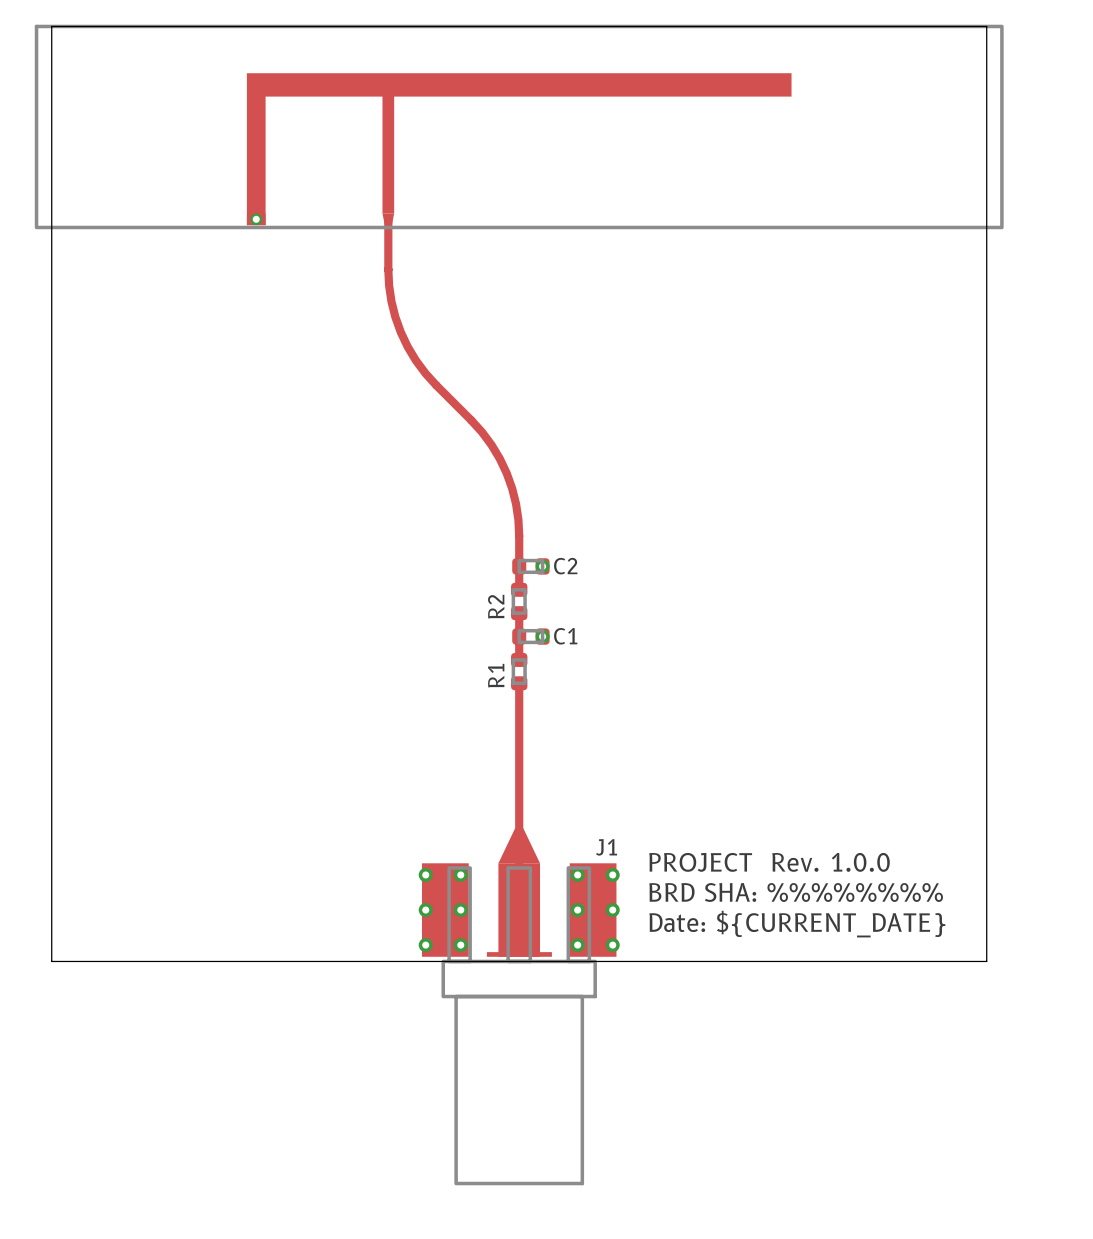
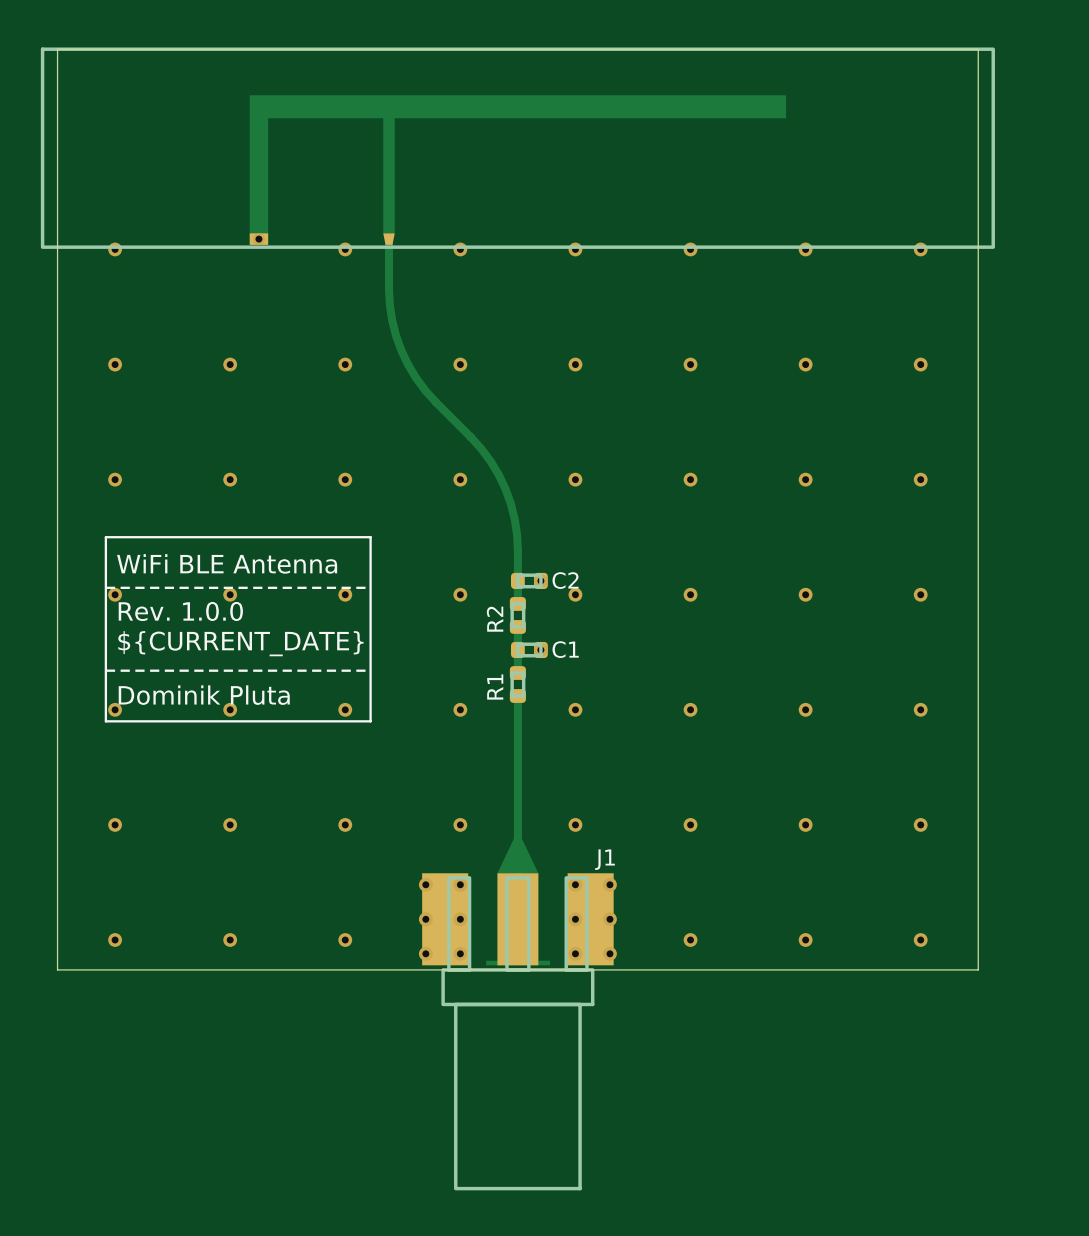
via: none -> (115, 249)
via: none -> (345, 249)
via: none -> (460, 249)
via: none -> (575, 249)
via: none -> (690, 249)
via: none -> (805, 249)
via: none -> (920, 249)
via: none -> (115, 364)
via: none -> (230, 364)
via: none -> (345, 364)
via: none -> (460, 364)
via: none -> (575, 364)
via: none -> (690, 364)
via: none -> (805, 364)
via: none -> (920, 364)
via: none -> (115, 479)
via: none -> (230, 479)
via: none -> (345, 479)
via: none -> (460, 479)
via: none -> (575, 479)
via: none -> (690, 479)
via: none -> (805, 479)
via: none -> (920, 479)
line: none -> (105, 537) (370, 537) (370, 721) (105, 721) (105, 537)
text: none -> WiFi BLE Antenna (227, 563)
line: none -> (105, 587) (370, 587)
via: none -> (115, 594)
via: none -> (230, 594)
via: none -> (345, 594)
via: none -> (460, 594)
via: none -> (575, 594)
via: none -> (690, 594)
via: none -> (805, 594)
via: none -> (920, 594)
text: none -> Rev. 1.0.0 (180, 611)
text: none -> ${CURRENT_DATE} (240, 643)
line: none -> (105, 670) (370, 670)
text: none -> Dominik Pluta (204, 695)
via: none -> (115, 709)
via: none -> (230, 709)
via: none -> (345, 709)
via: none -> (460, 709)
via: none -> (575, 709)
via: none -> (690, 709)
via: none -> (805, 709)
via: none -> (920, 709)
via: none -> (115, 824)
via: none -> (230, 824)
via: none -> (345, 824)
via: none -> (460, 824)
via: none -> (575, 824)
via: none -> (690, 824)
via: none -> (805, 824)
via: none -> (920, 824)
text: PROJECT Rev. 1.0.0 (769, 862) -> none
text: BRD SHA: %%%%%%%% (796, 892) -> none
text: Date: ${CURRENT_DATE} (797, 924) -> none
via: none -> (115, 940)
via: none -> (230, 940)
via: none -> (345, 940)
via: none -> (690, 940)
via: none -> (805, 940)
via: none -> (920, 940)

